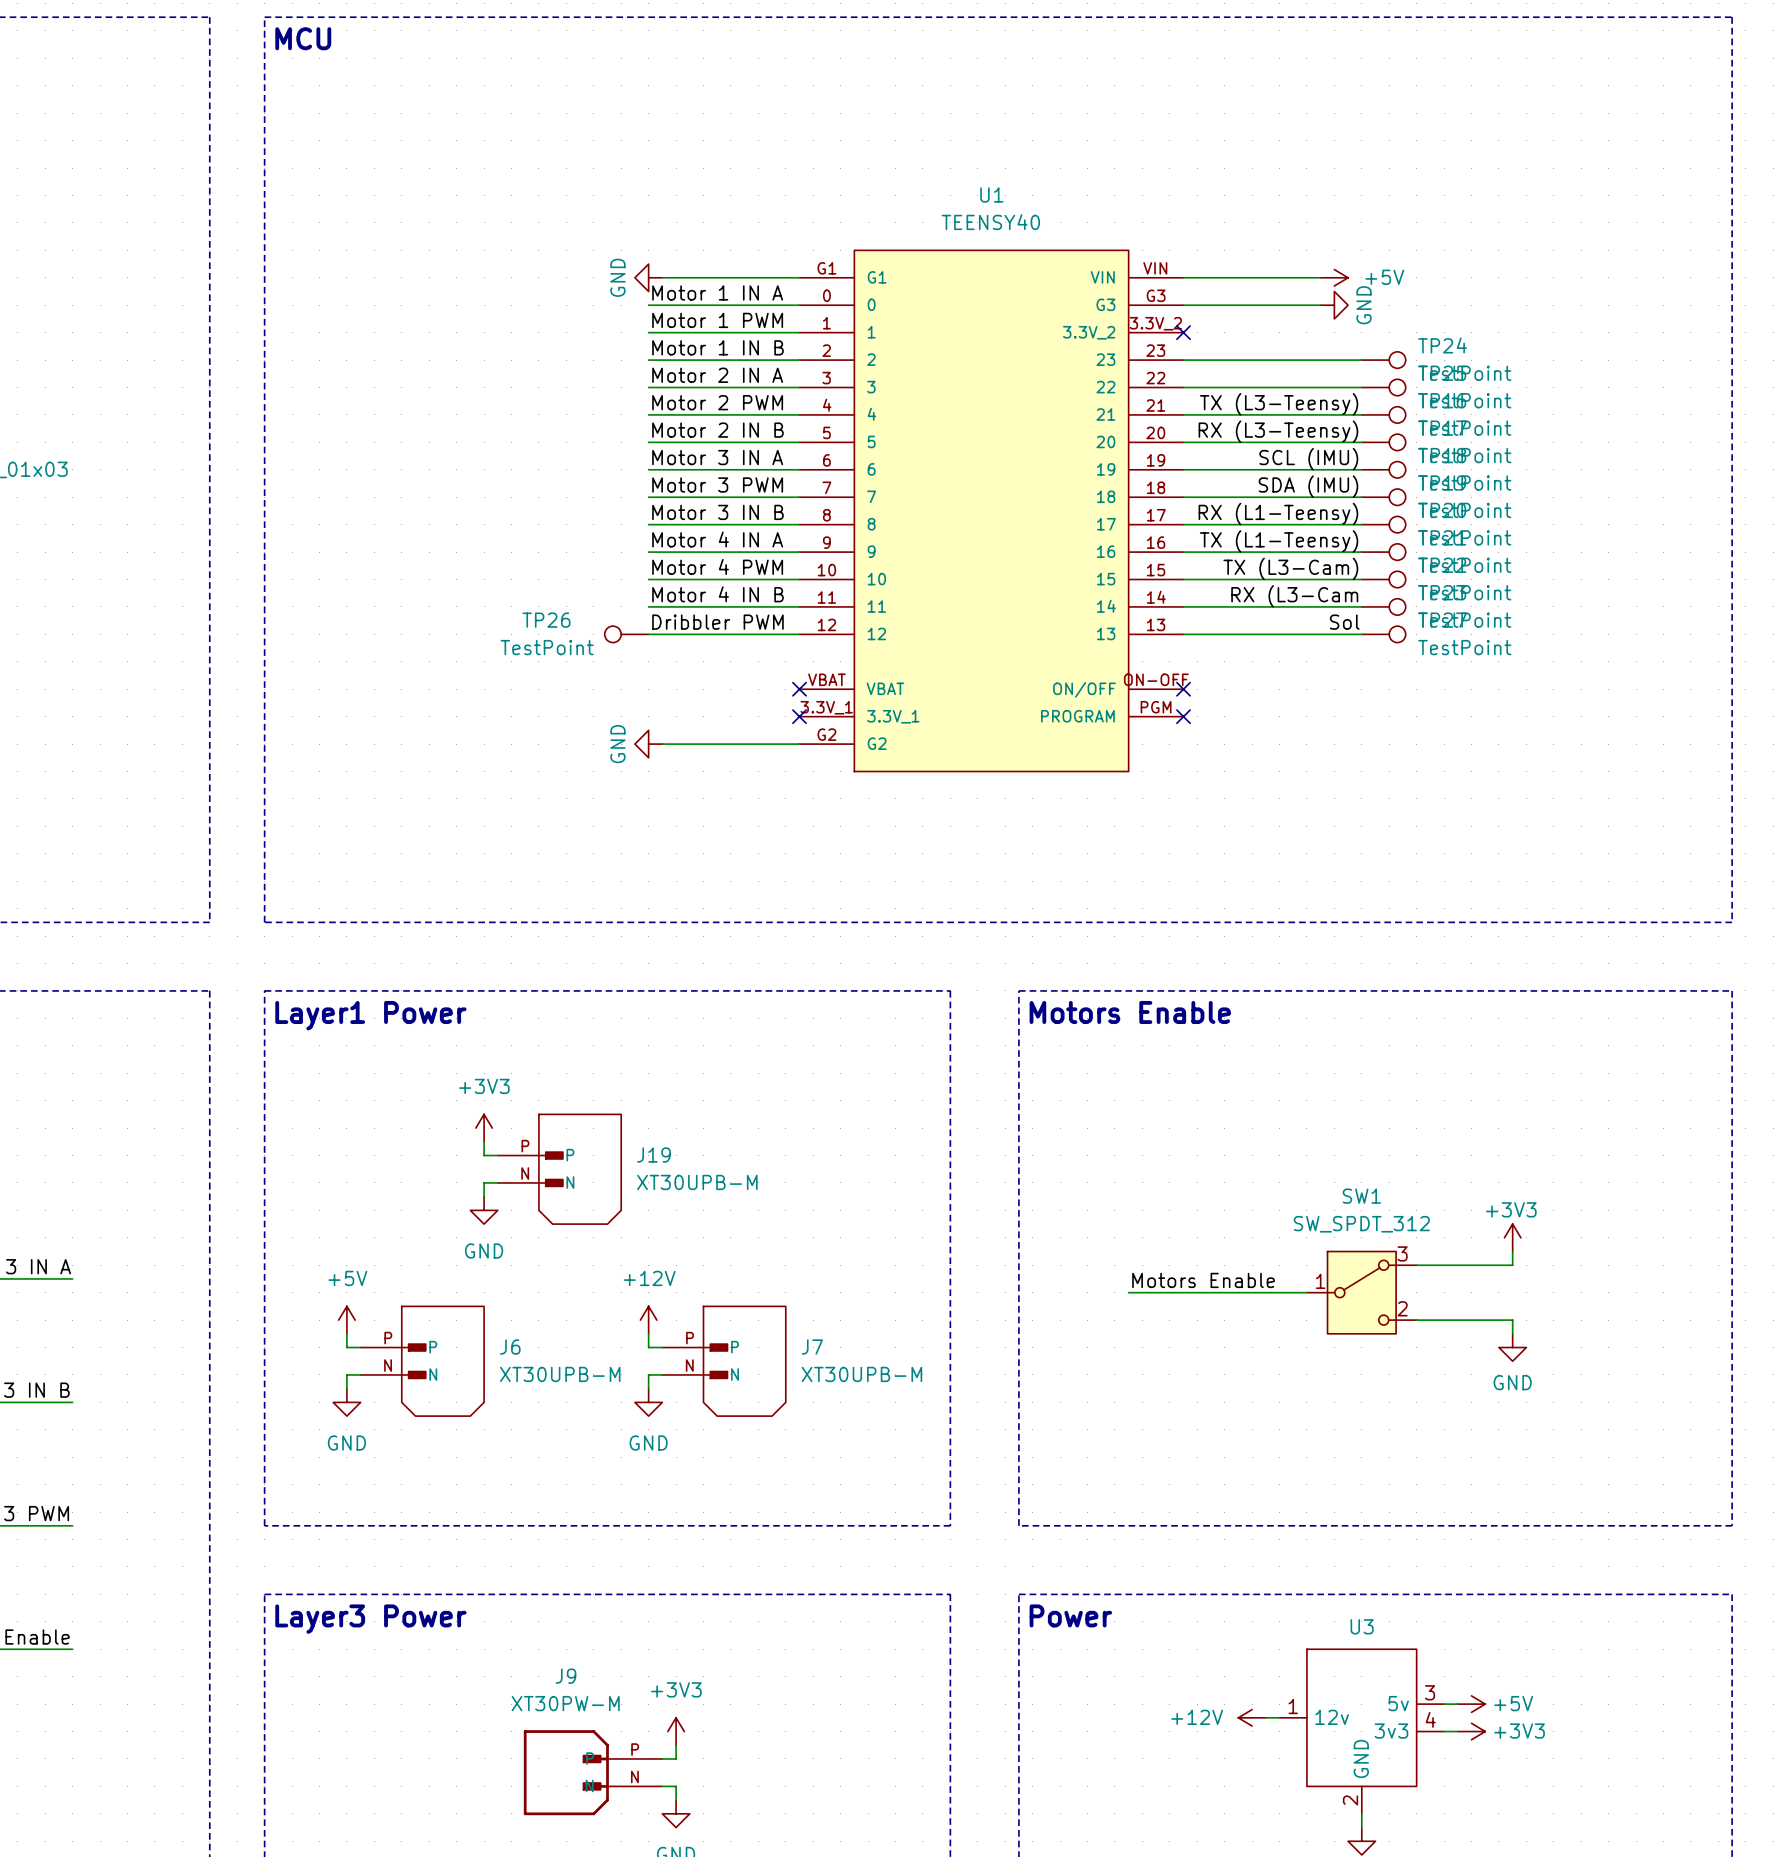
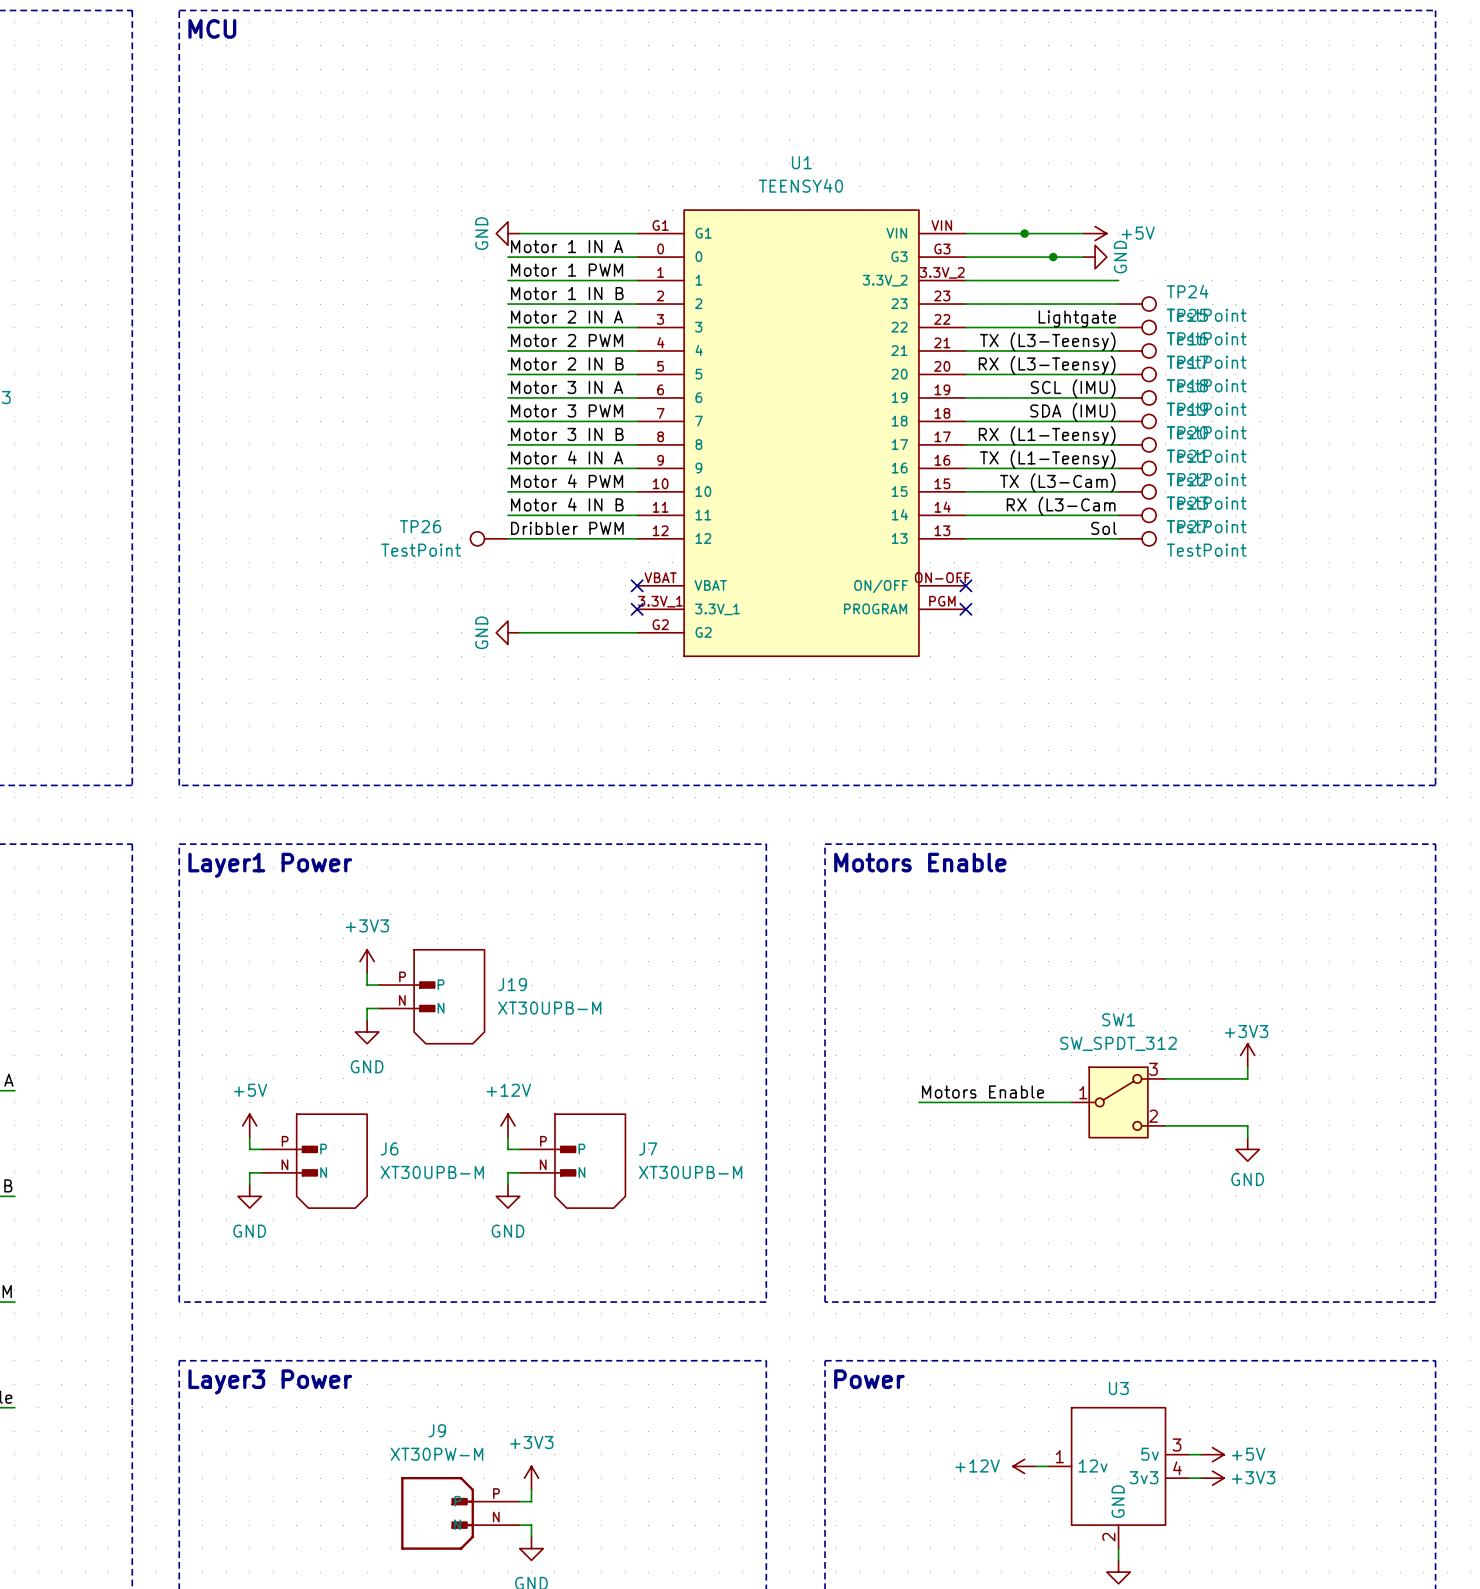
junction: none -> (1024, 233)
junction: none -> (1053, 257)
wire: none -> (965, 280) (1118, 280)
no-connect mark: (1183, 332) -> none
label: none -> Lightgate (1077, 318)

